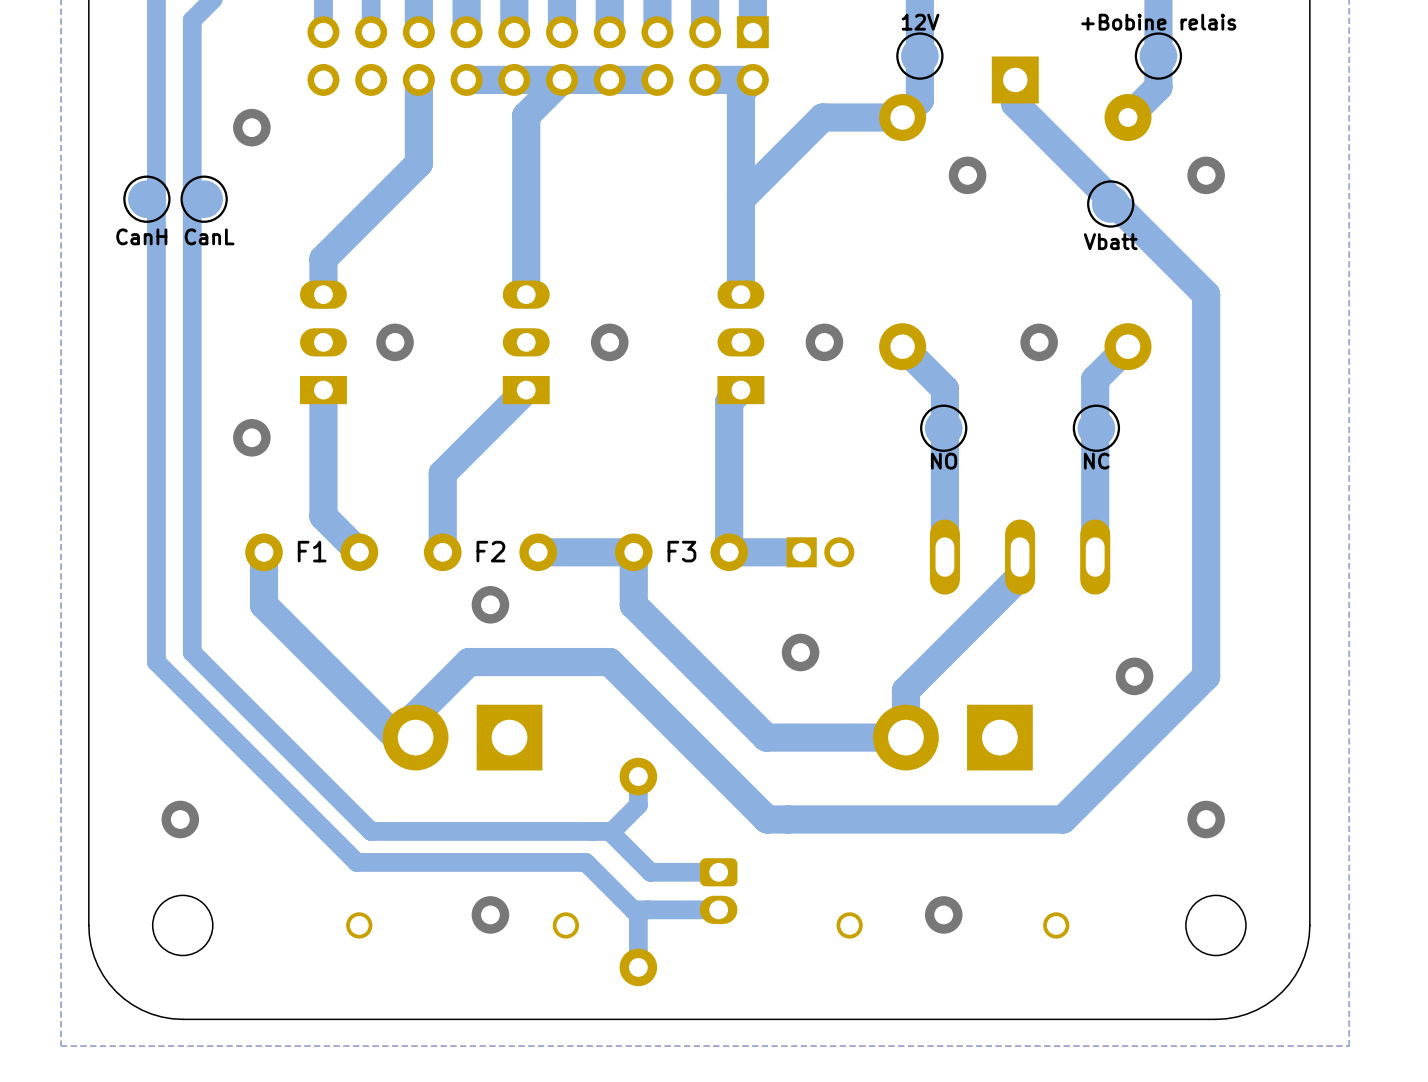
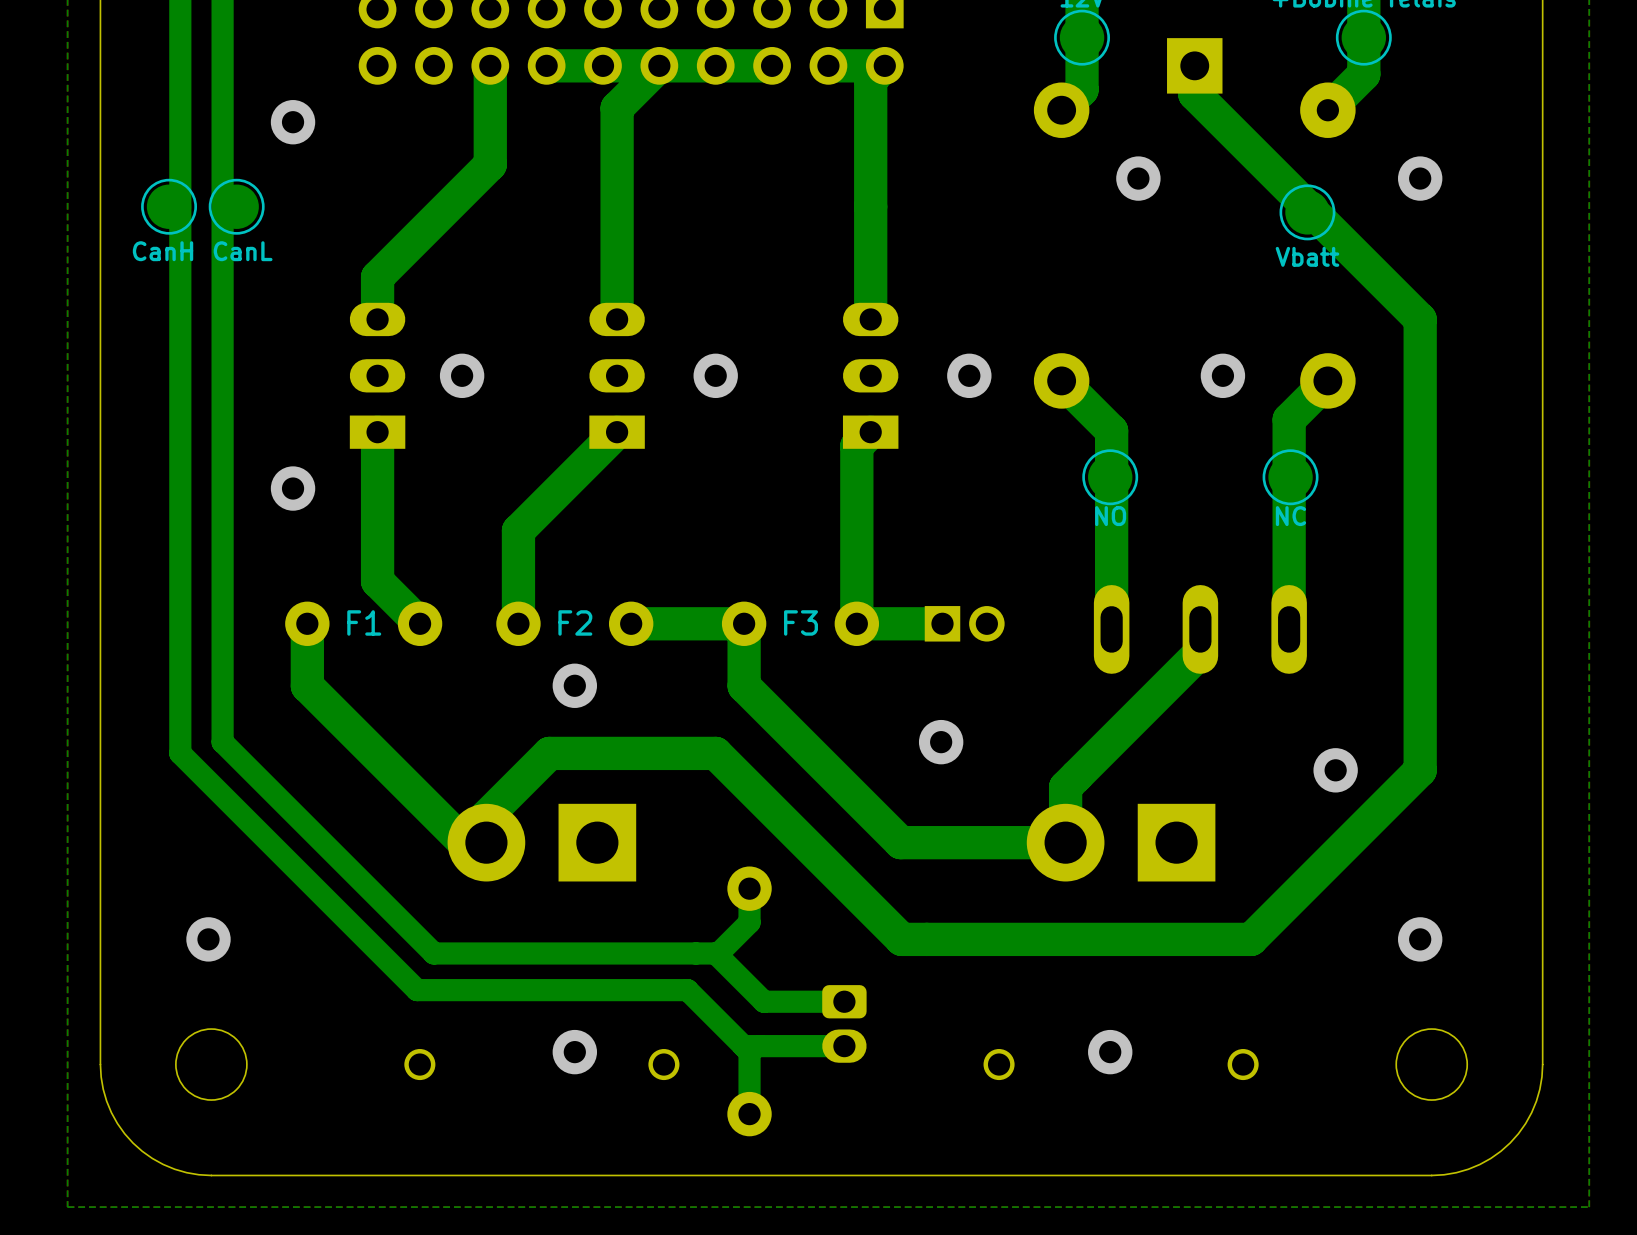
bottom track: (902, 117) (822, 117) (740, 199) -> none

